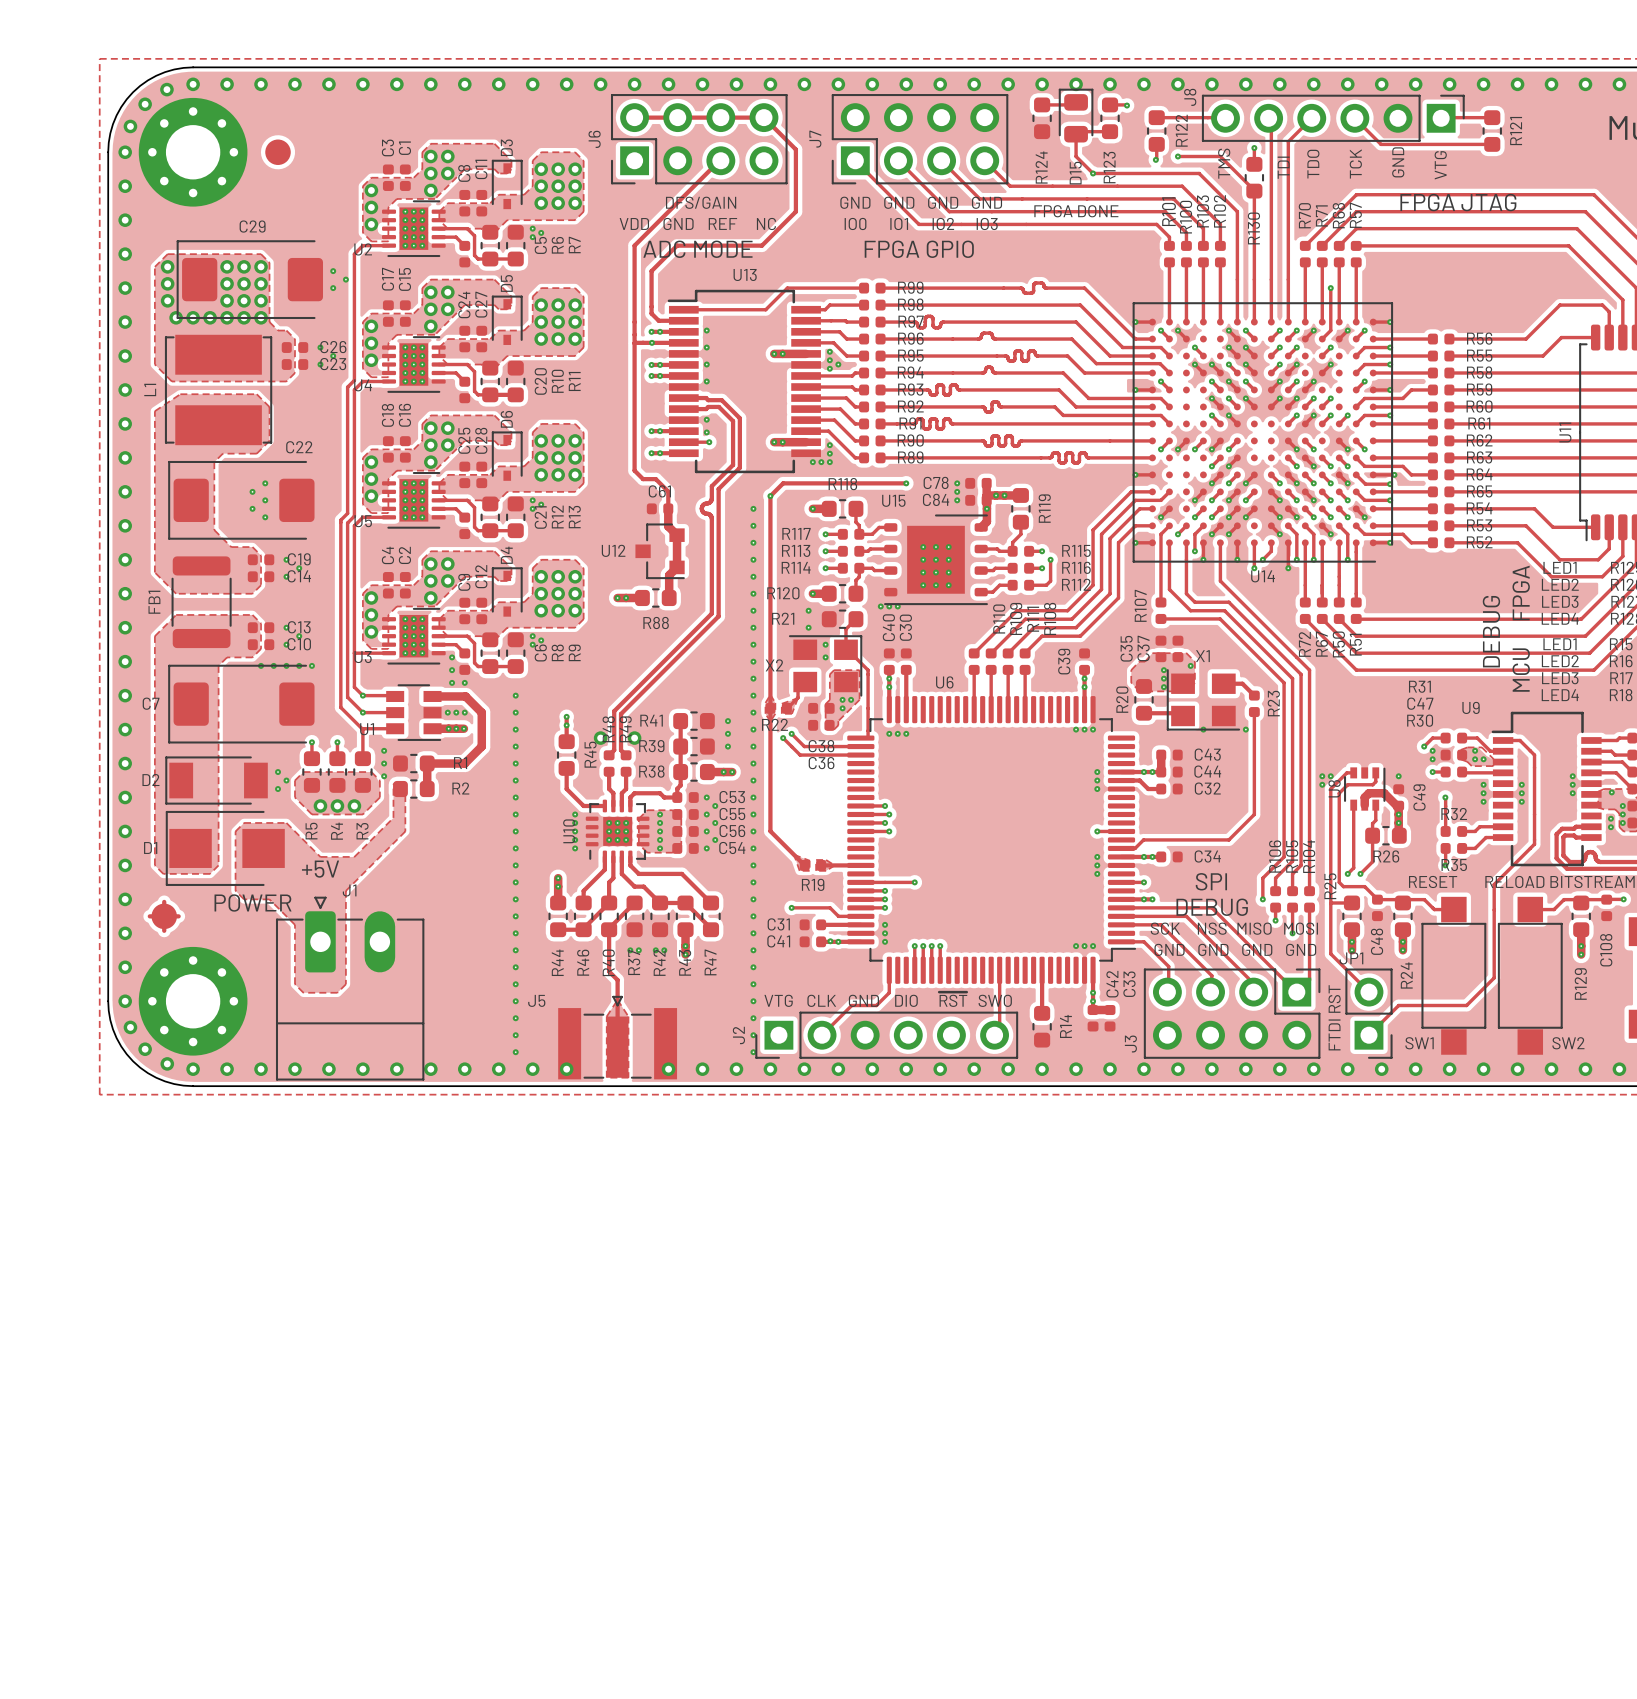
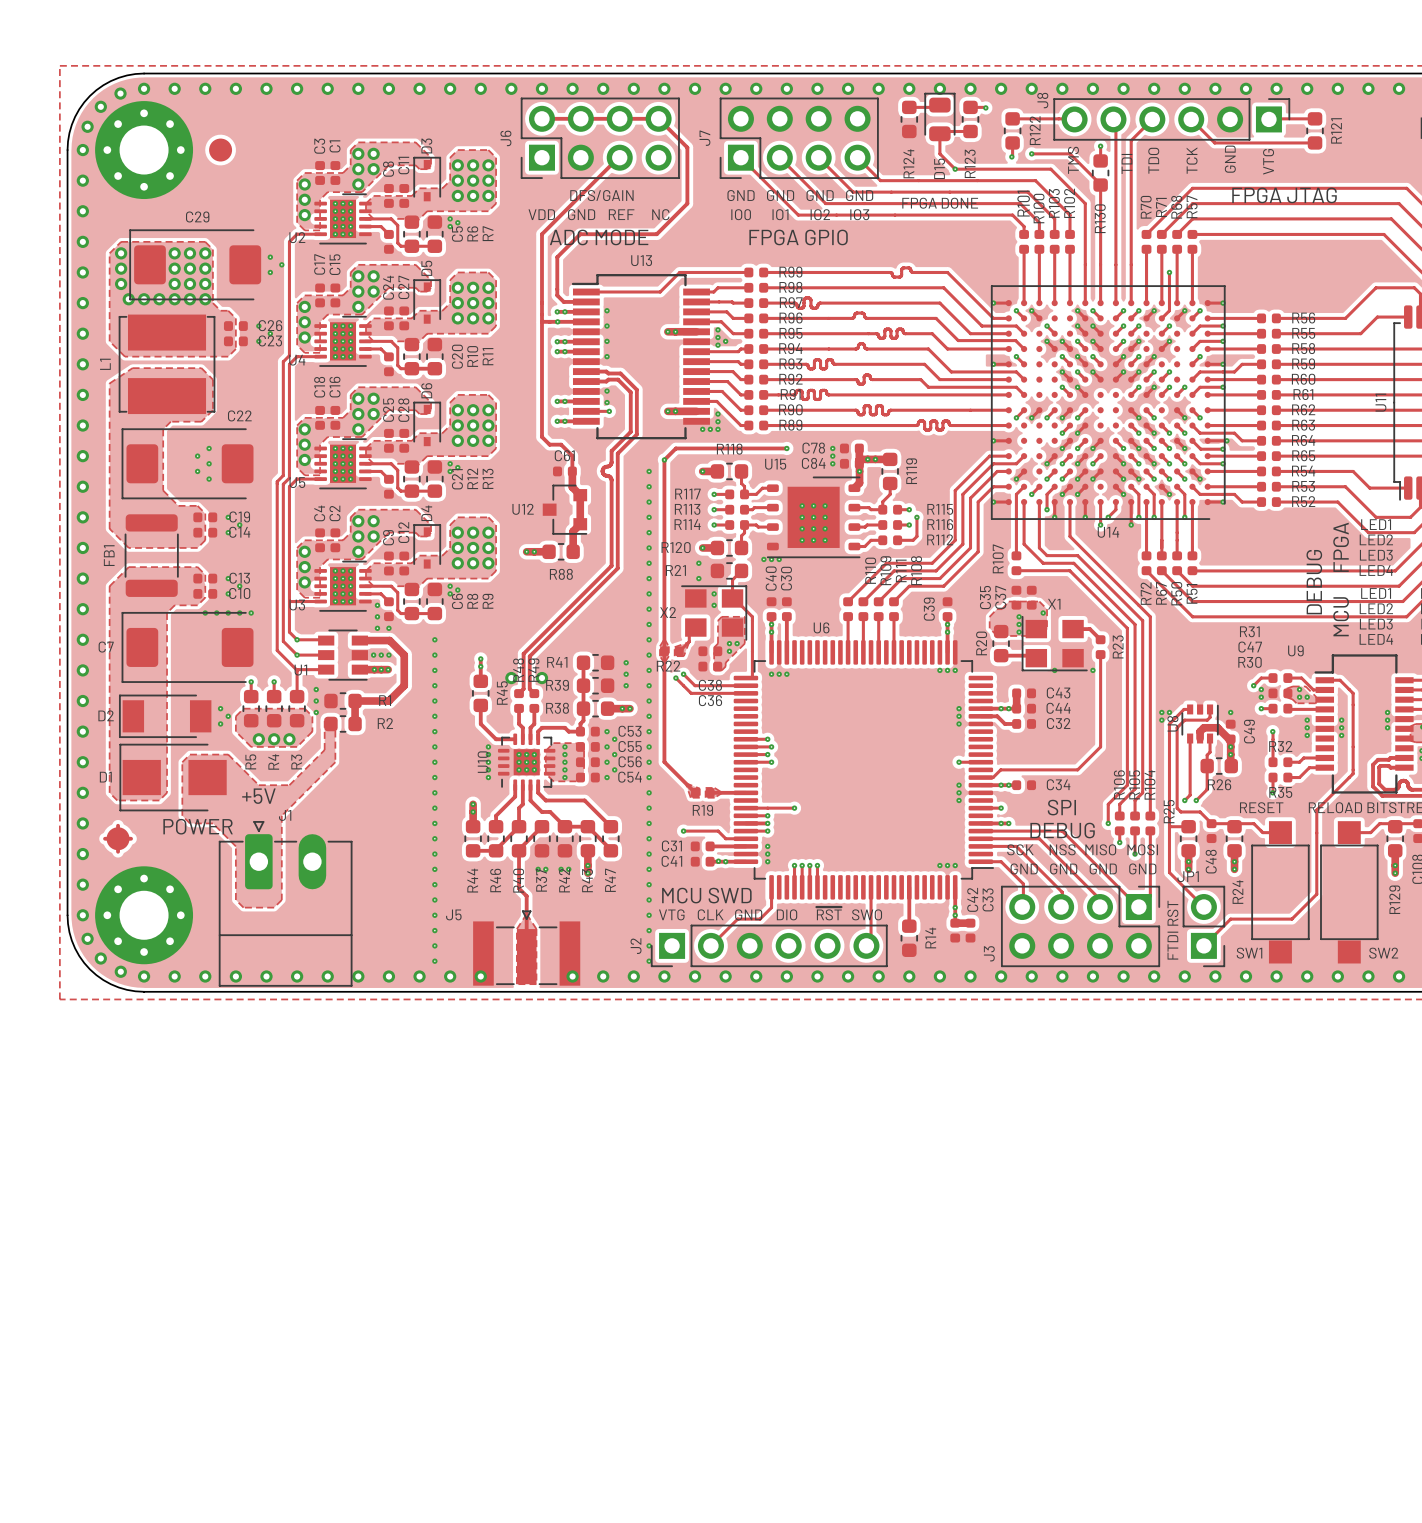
text: none -> MCU SWD (706, 895)

